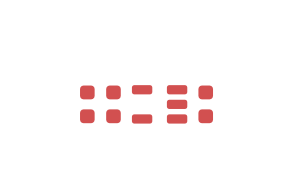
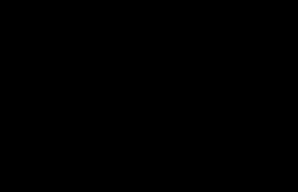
part: (87, 104) -> none
part: (113, 104) -> none
part: (159, 104) -> none
part: (205, 104) -> none

